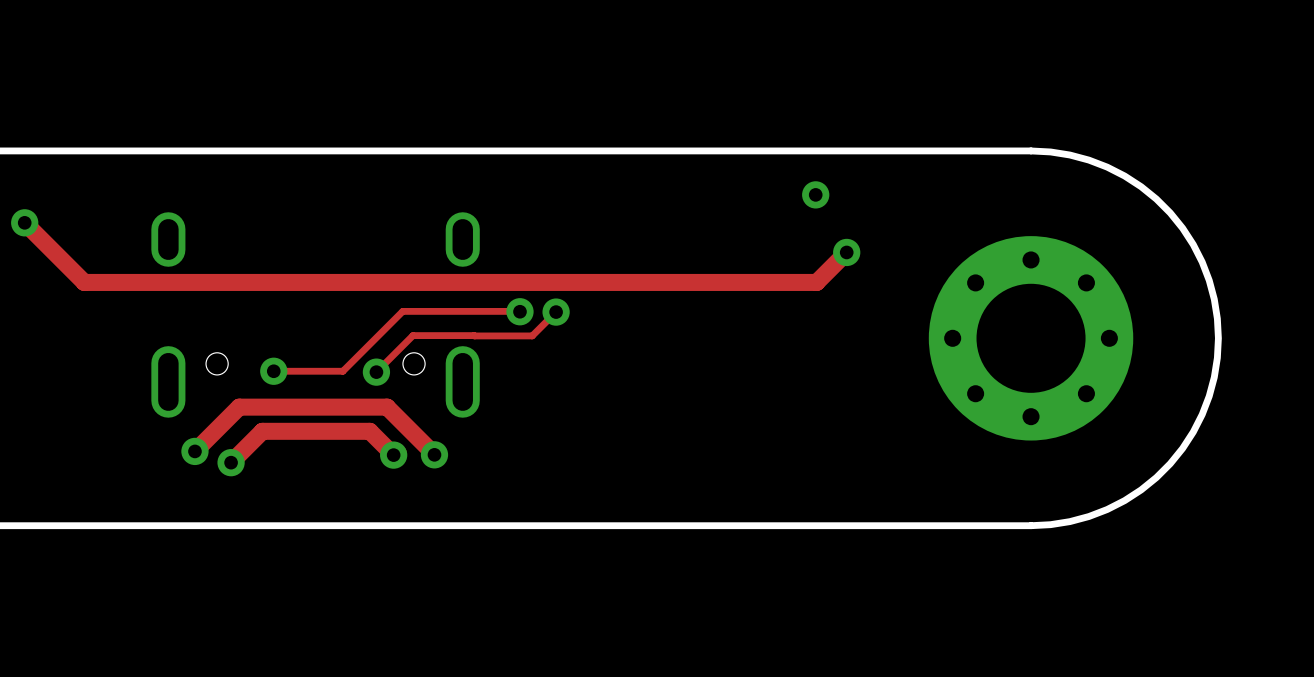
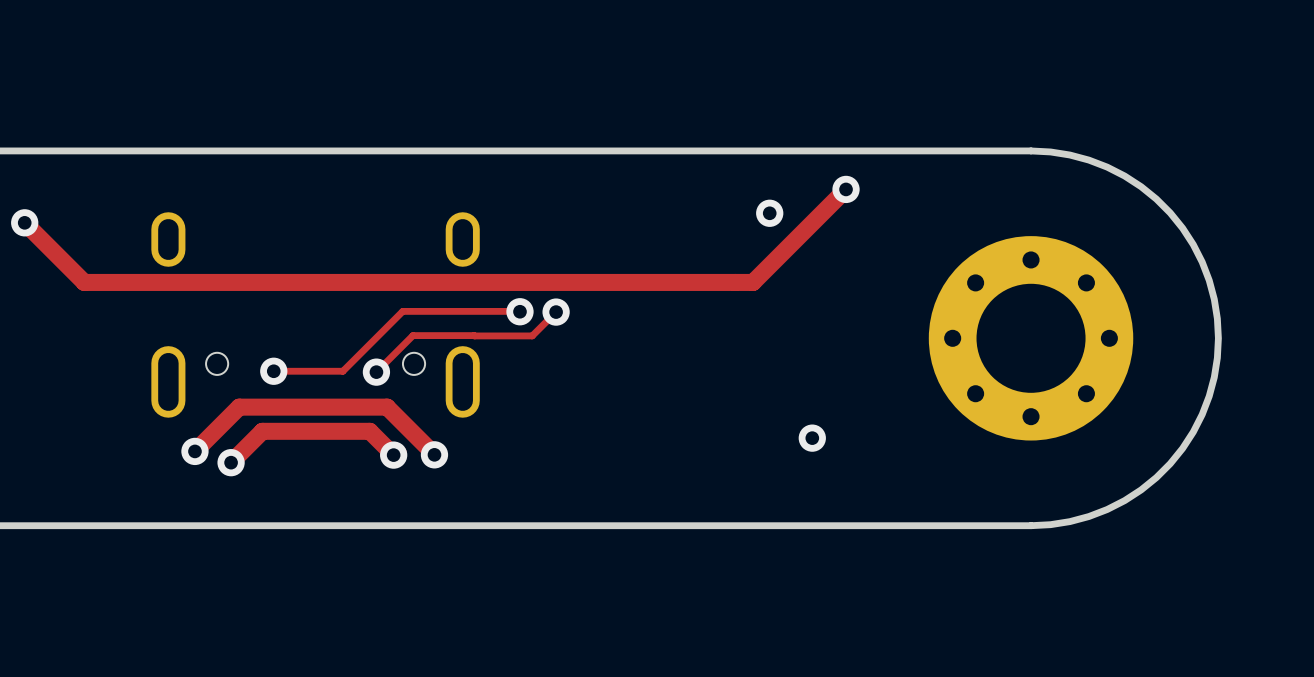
via: none -> (846, 189)
via: (815, 194) -> none
via: none -> (769, 213)
track: (846, 252) (816, 282) (753, 282) -> (846, 189) (753, 282)
via: (846, 252) -> none
via: none -> (812, 438)

